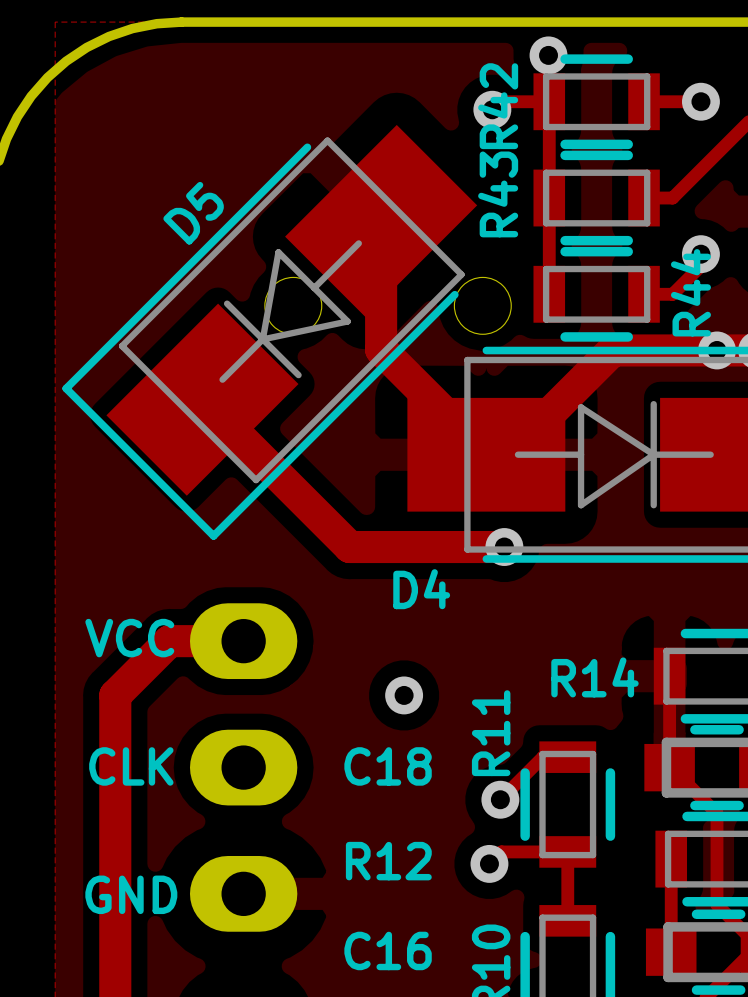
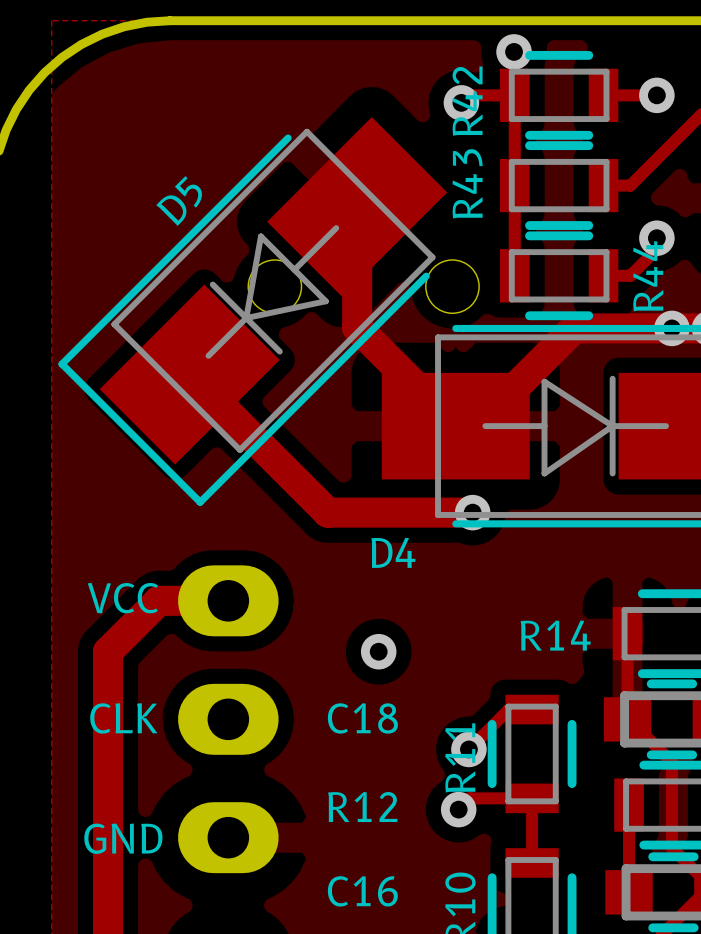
R11 name position: R11 (491, 733) -> R11 (460, 757)

